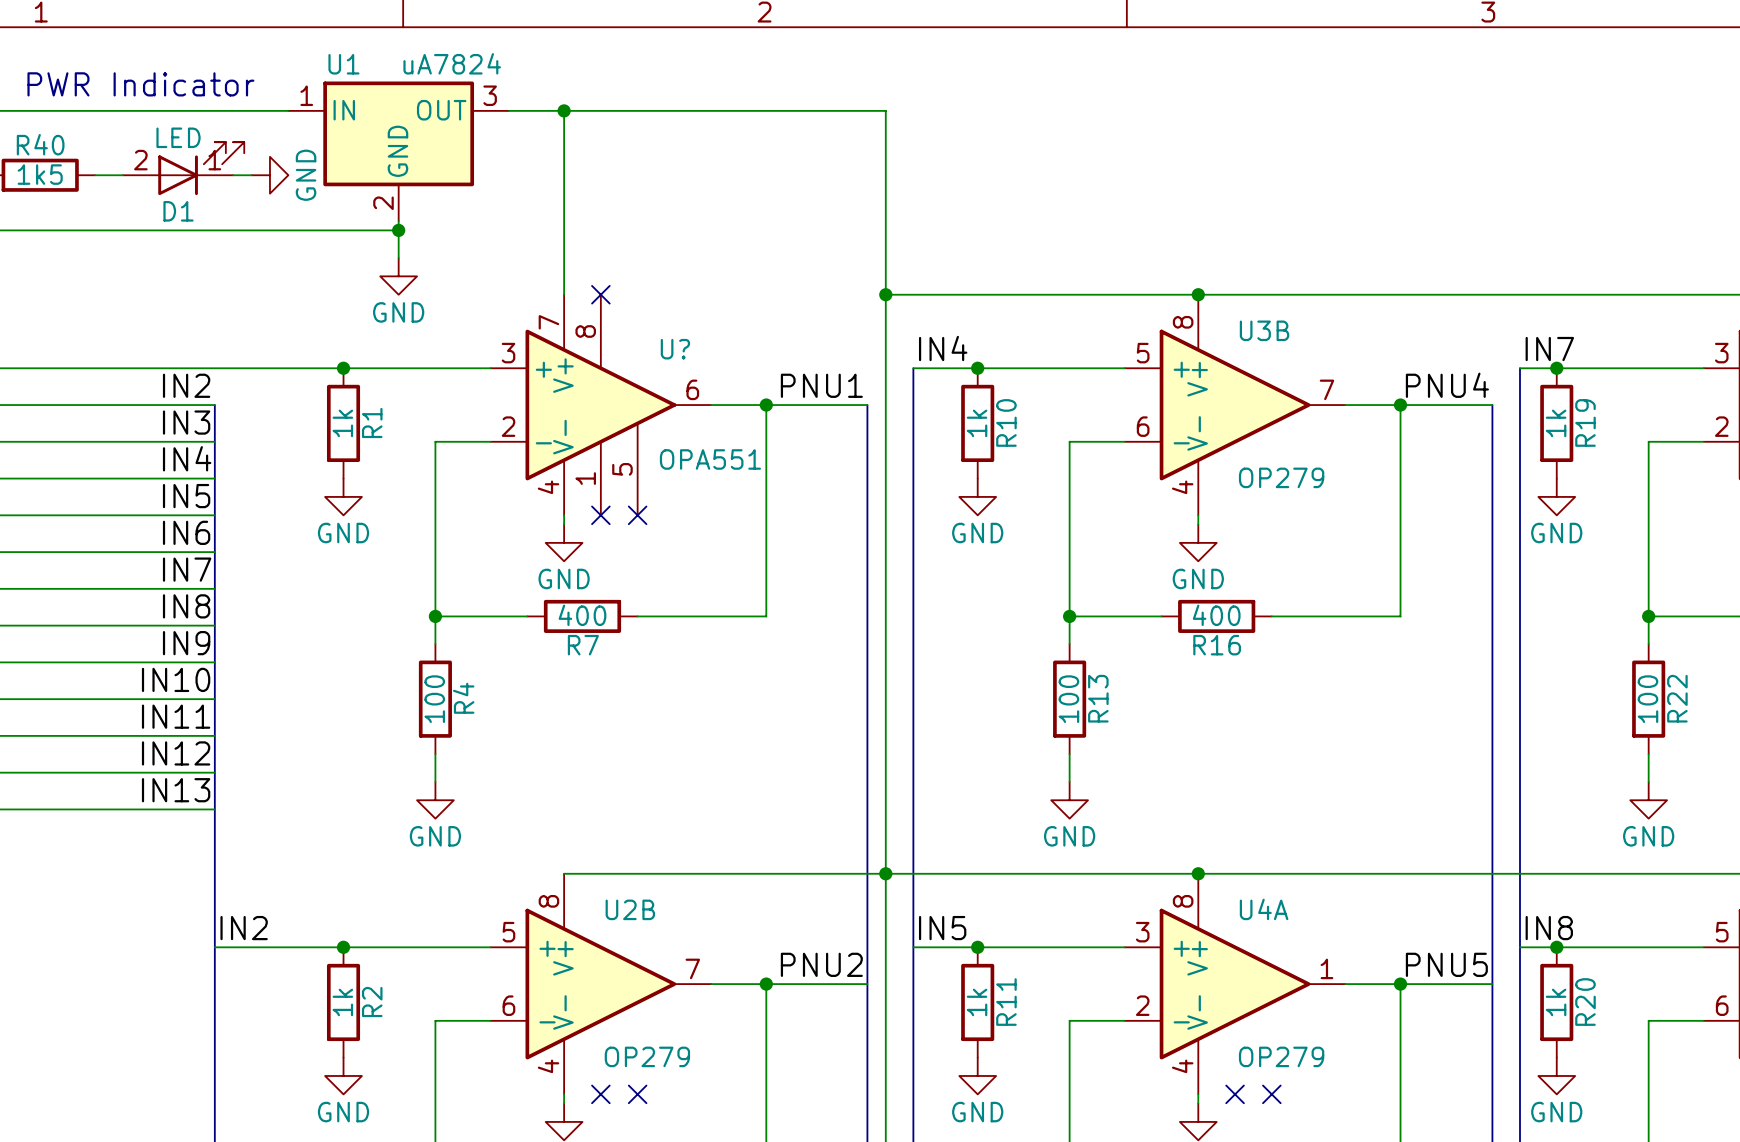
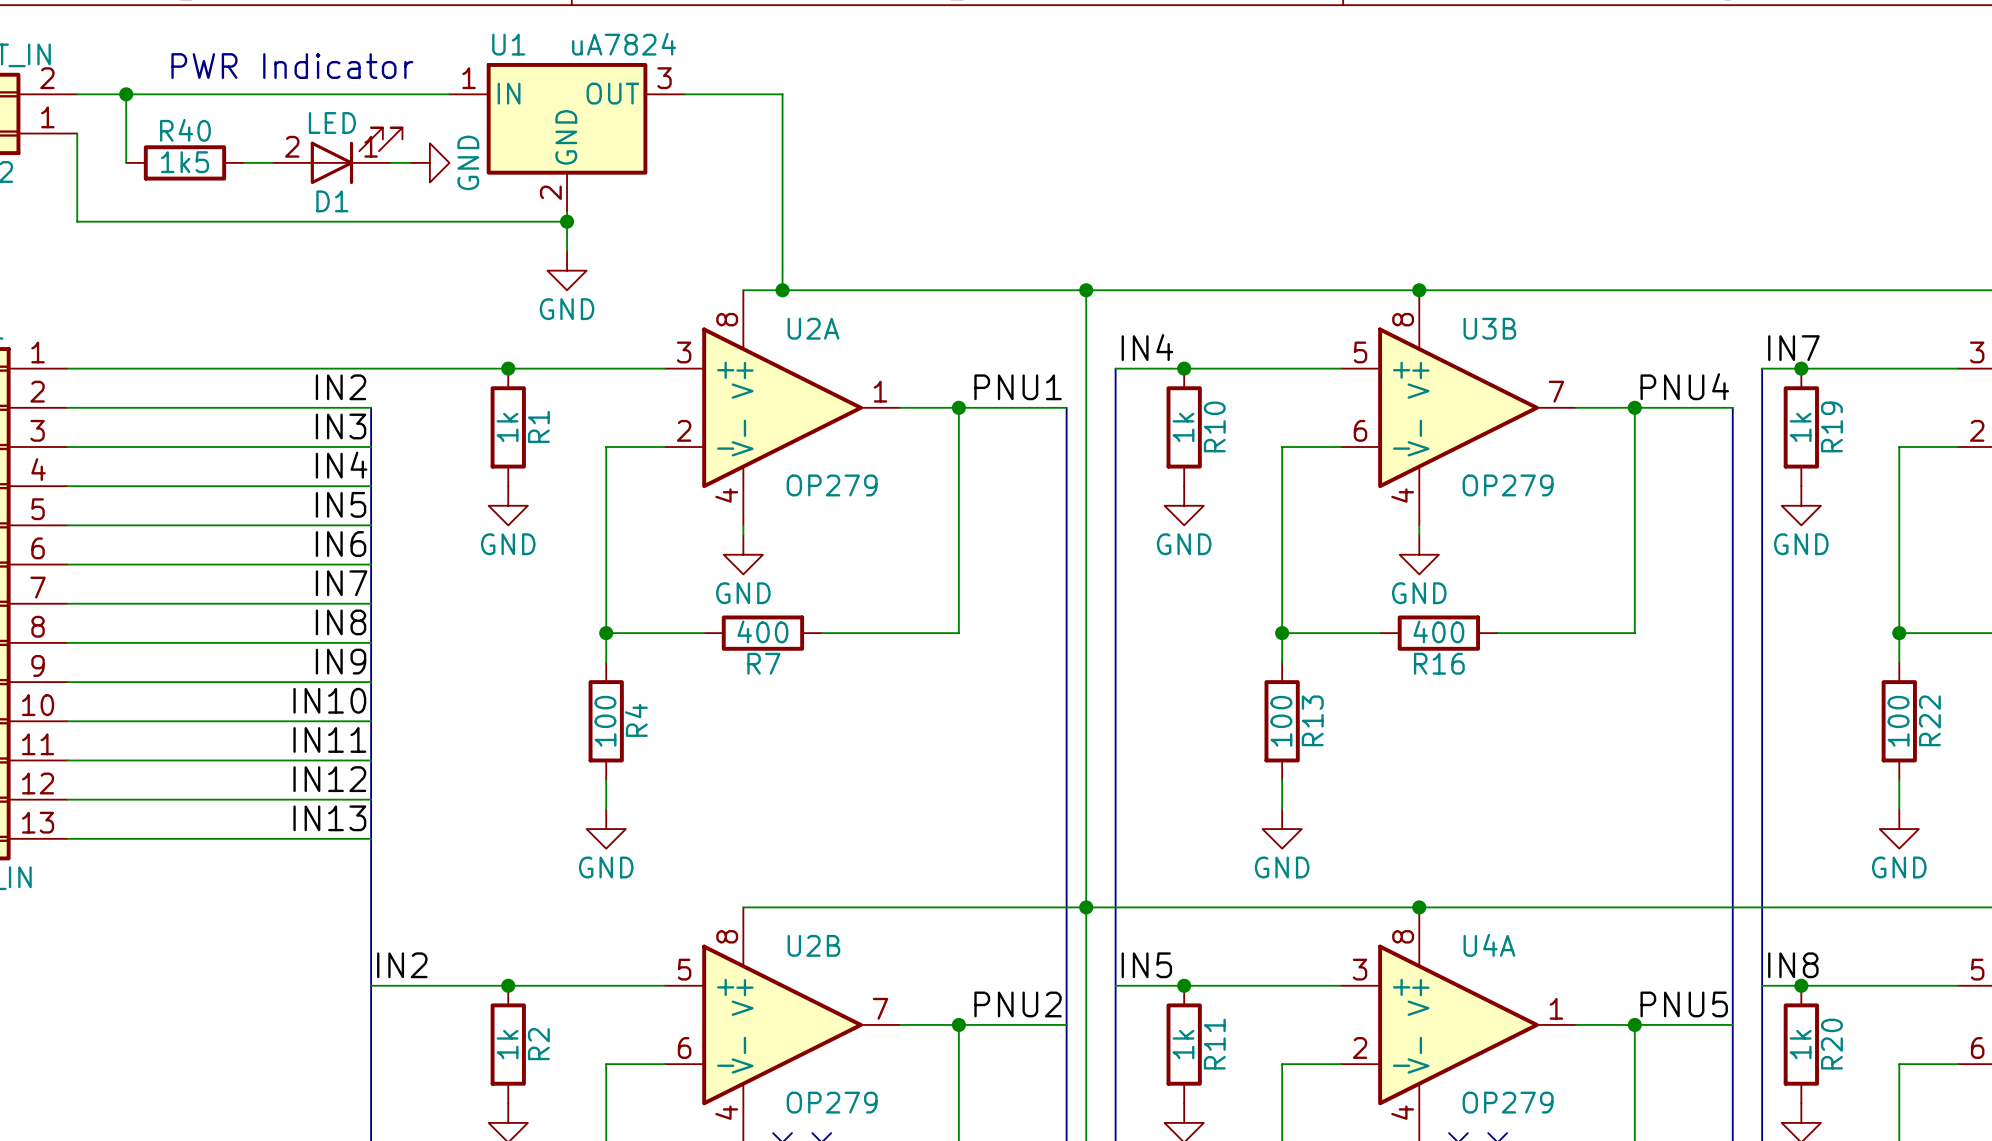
wire: (564, 110) (564, 294) -> (782, 94) (782, 290)
junction: (564, 110) -> none
wire: (600, 110) (885, 110) (885, 294) -> (743, 290) (1086, 290)
junction: none -> (782, 290)
no-connect mark: (600, 294) -> none
U?: OPA551 (600, 405) -> none
U2A: none -> OP279 (782, 407)
no-connect mark: (600, 515) -> none
no-connect mark: (637, 515) -> none

